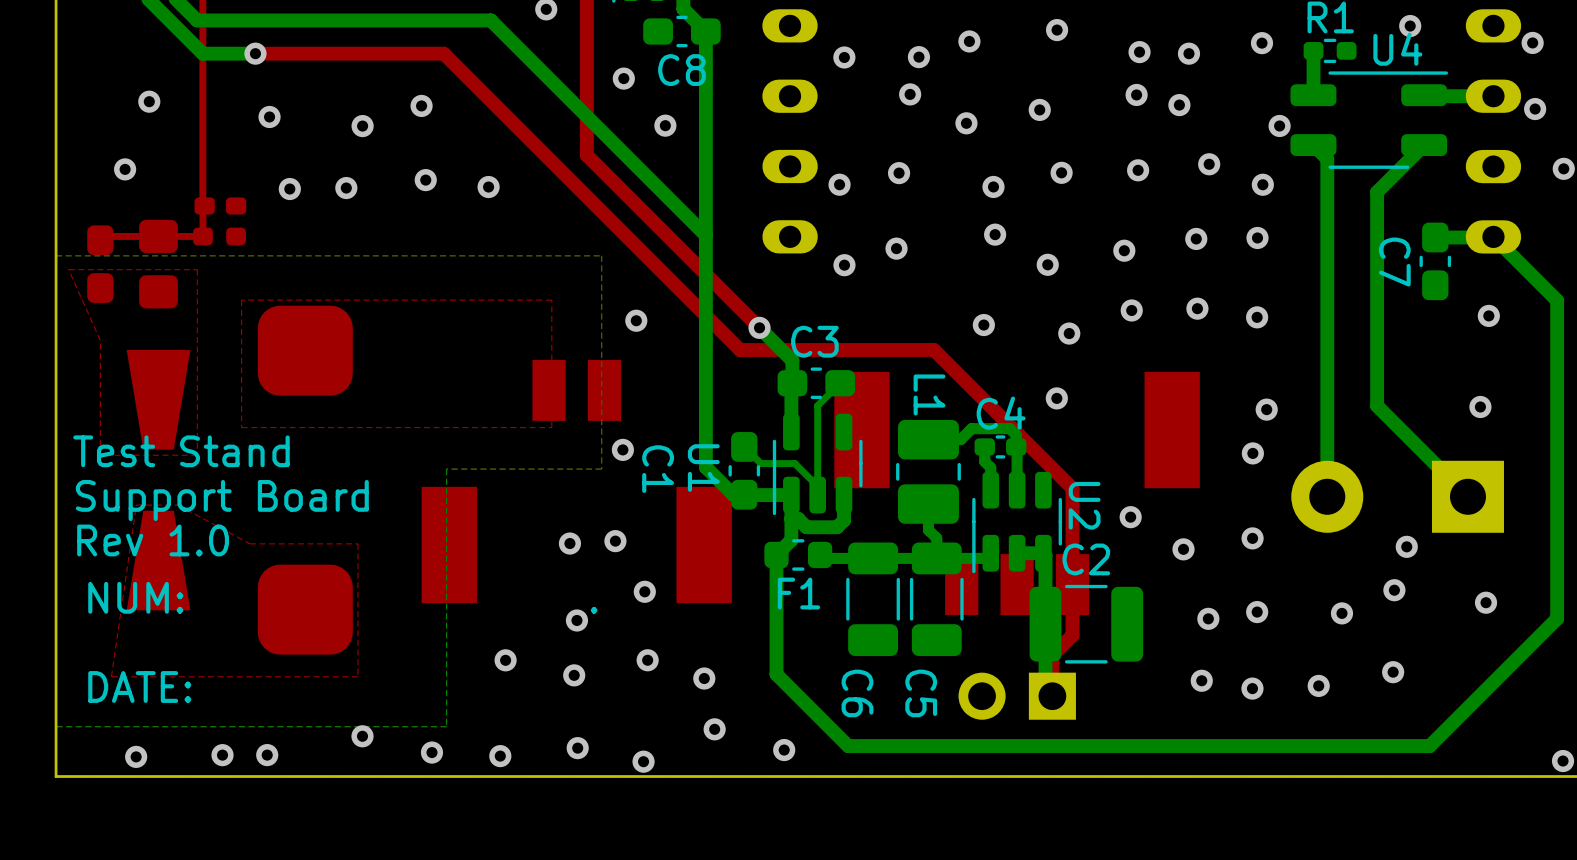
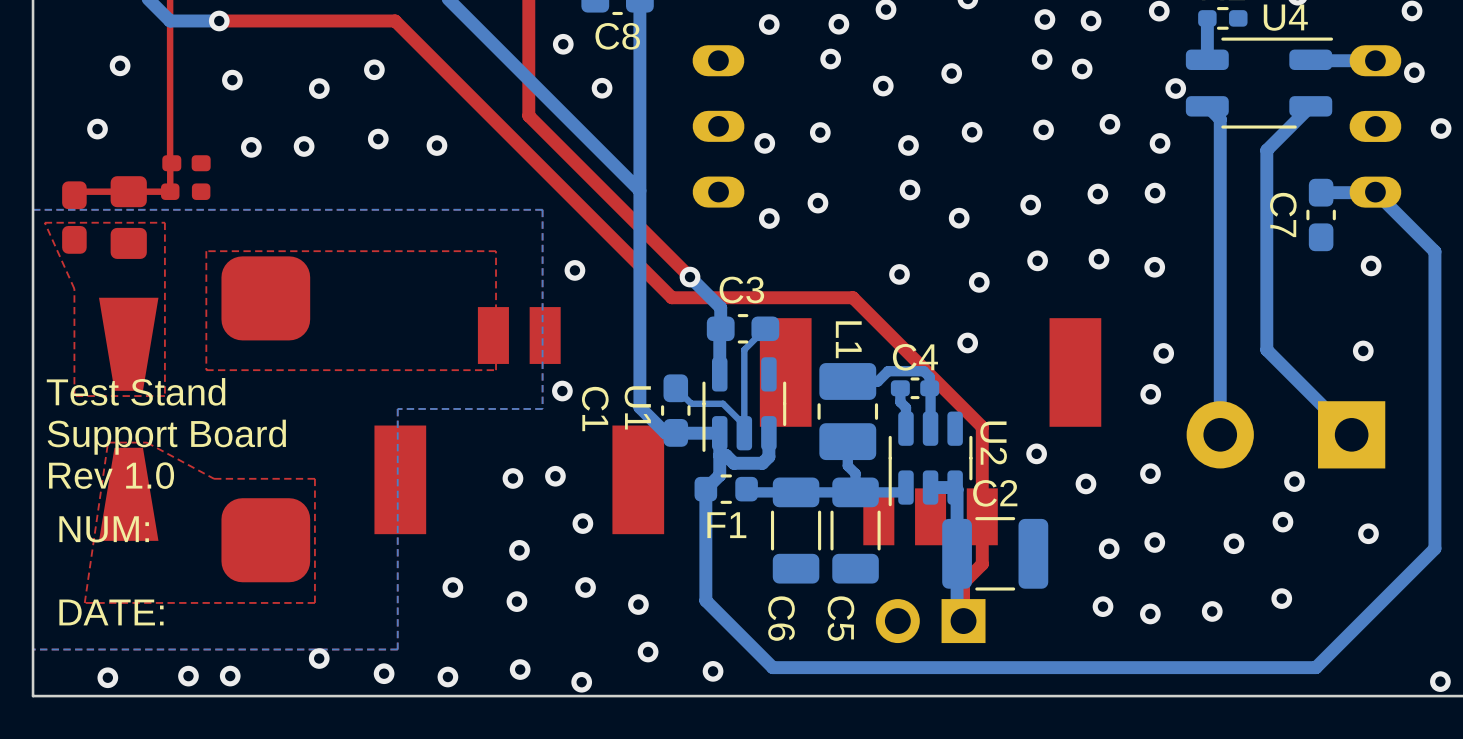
text: NUM: . (342, 597) -> NUM: (104, 529)

